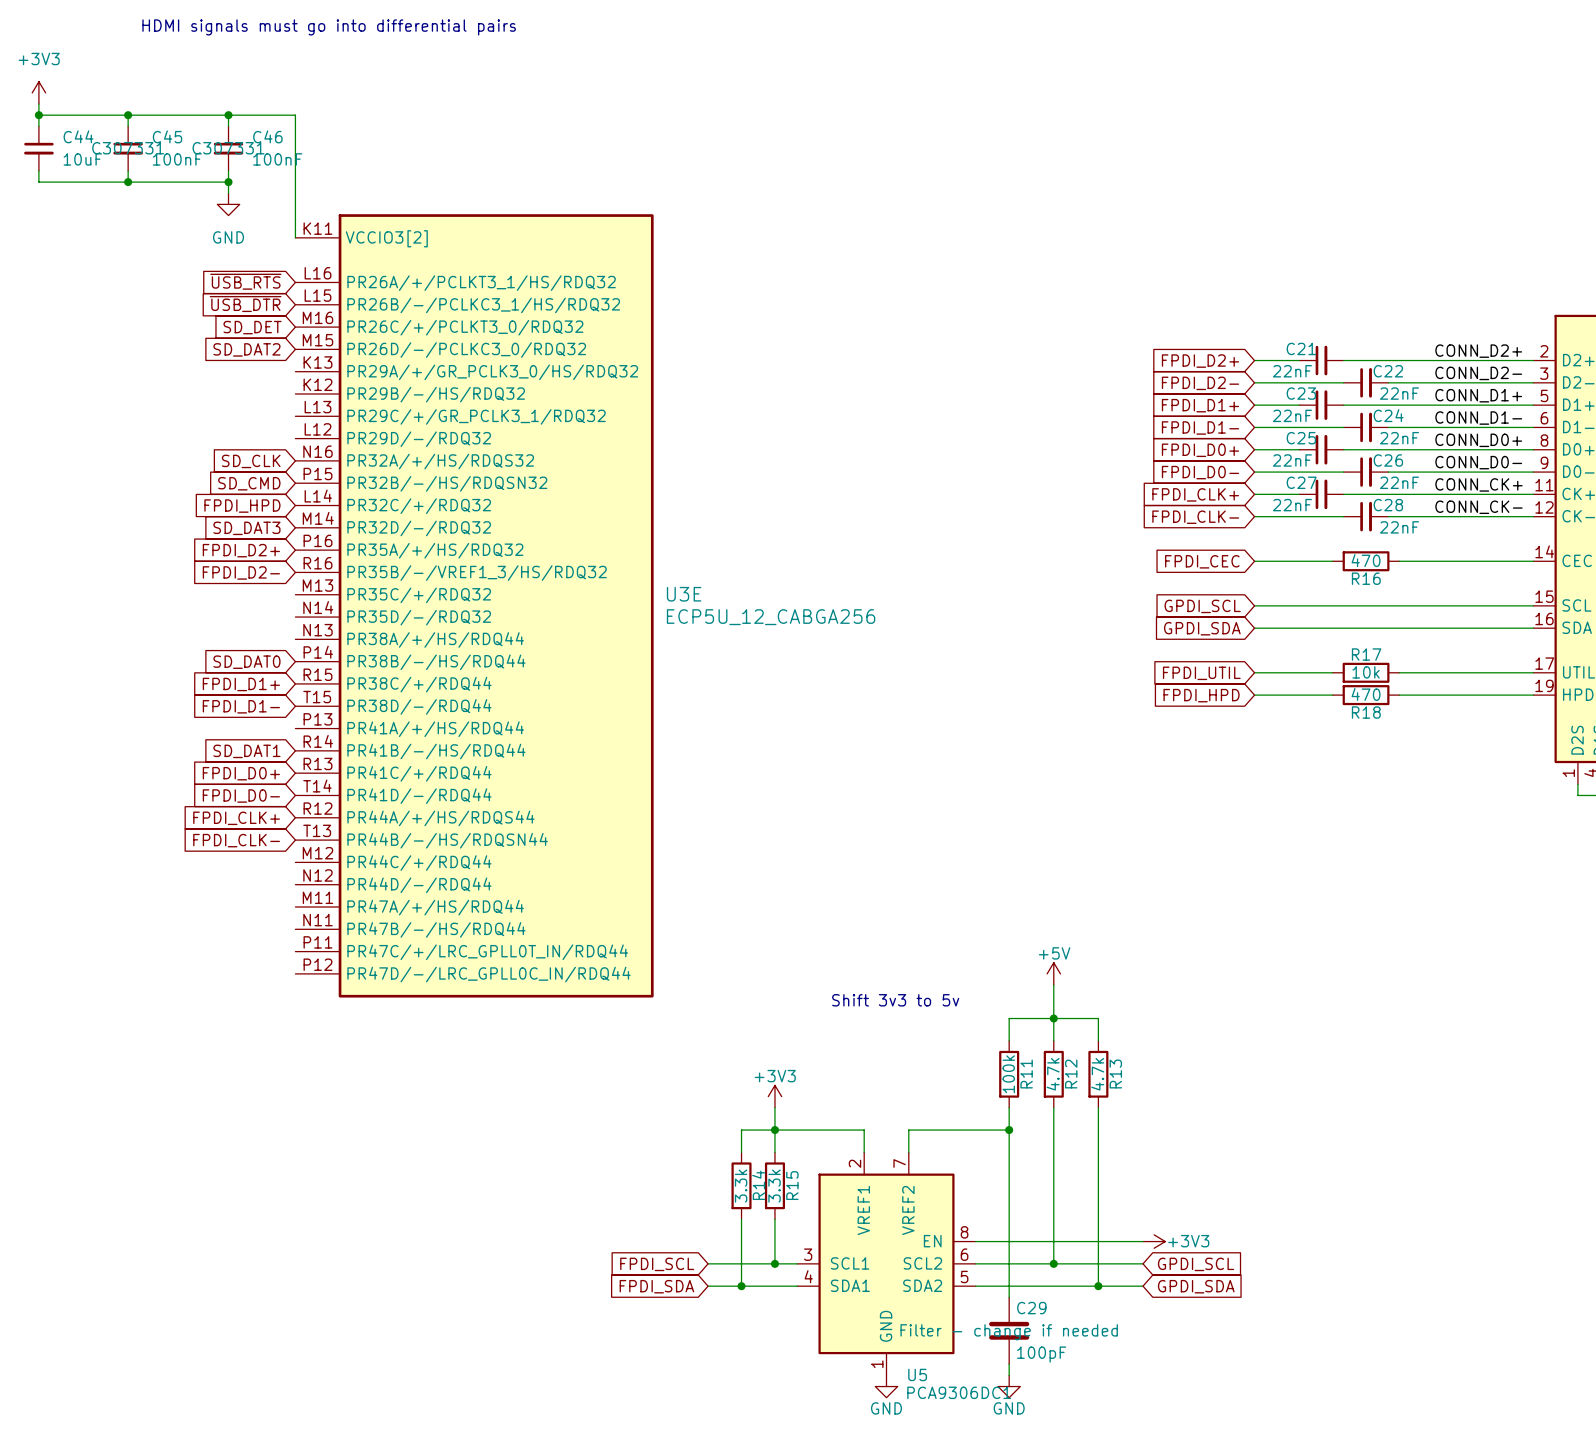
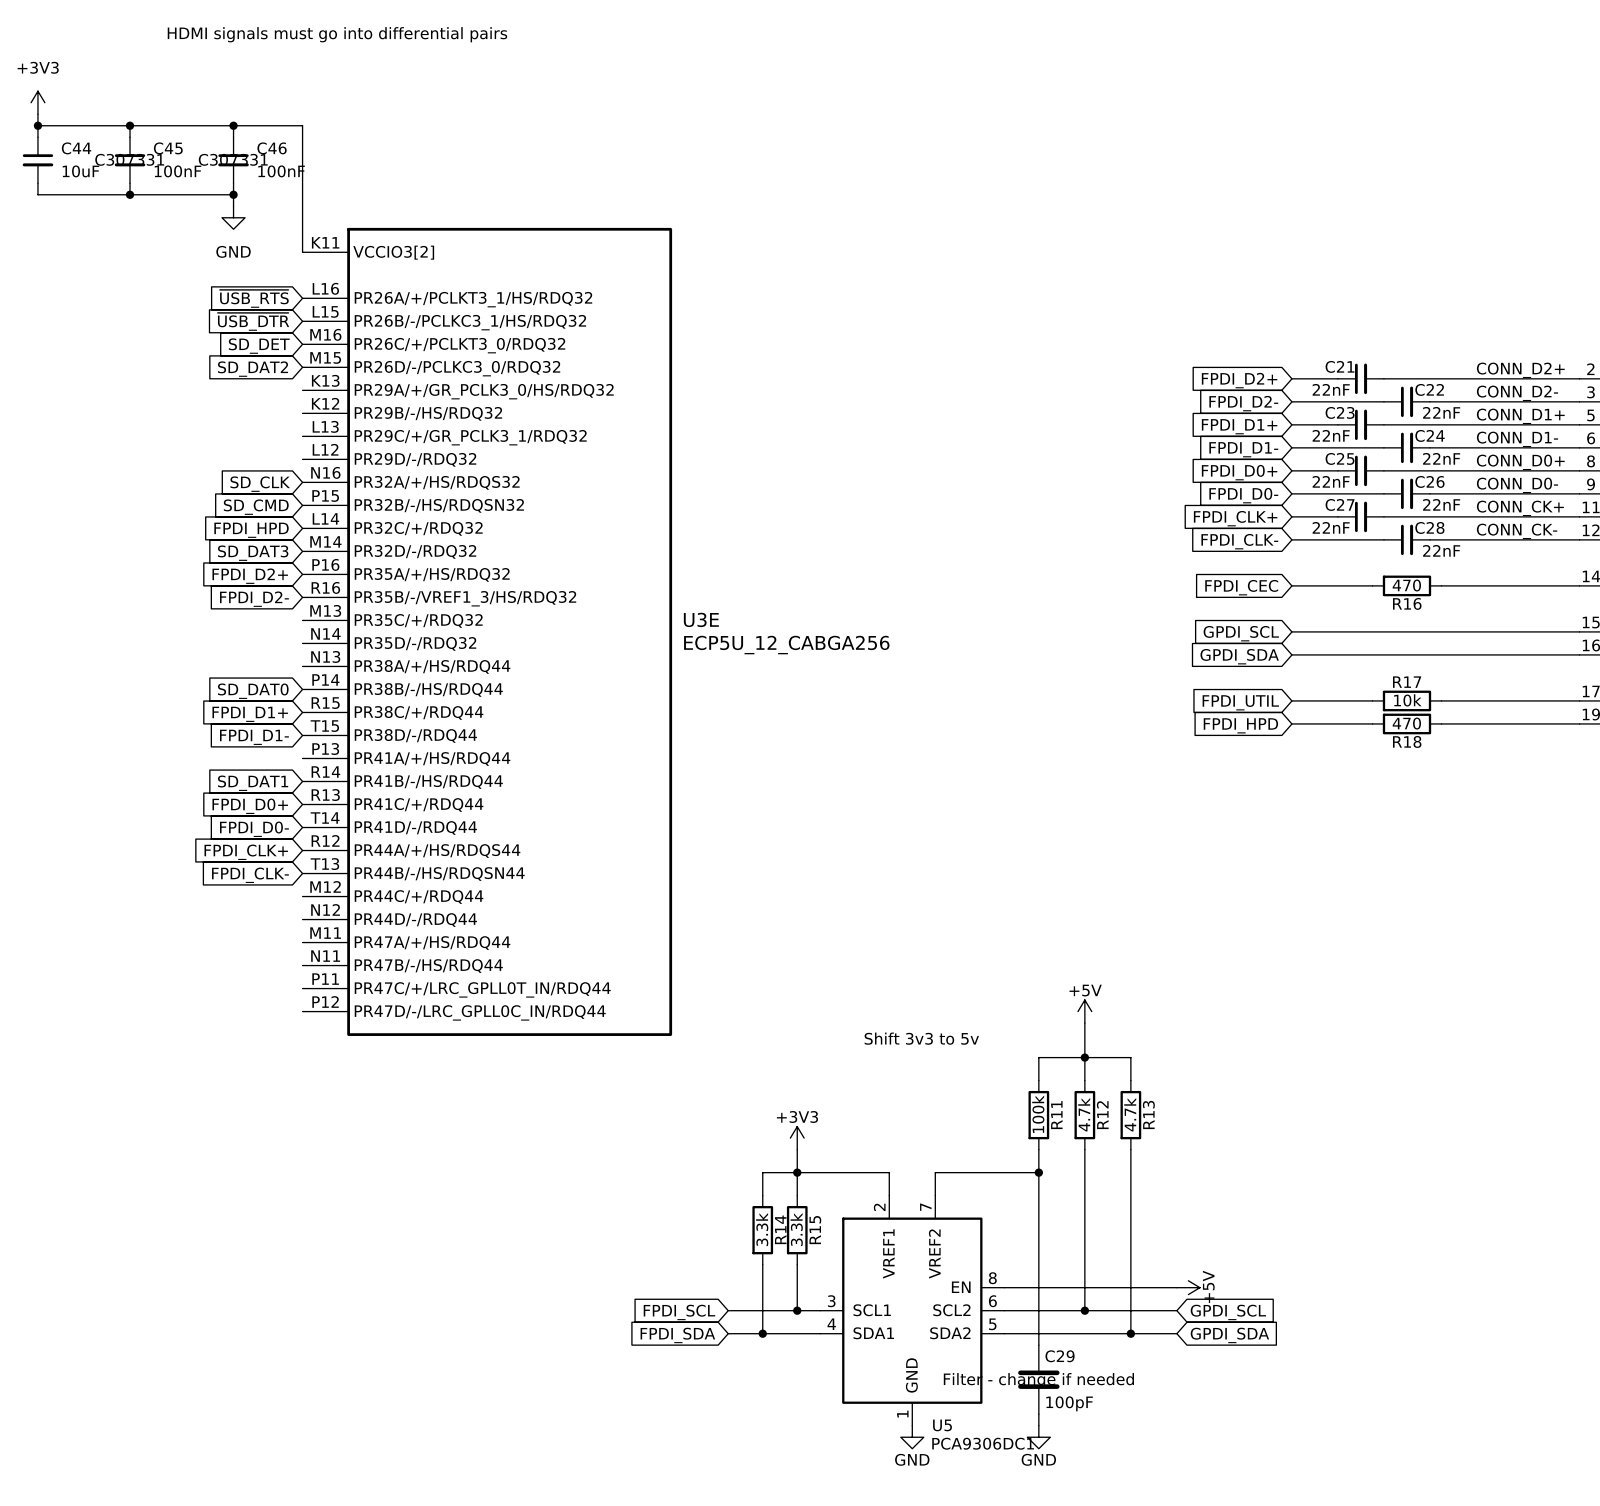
power symbol: +3V3 (1154, 1241) -> +5V (1188, 1287)

